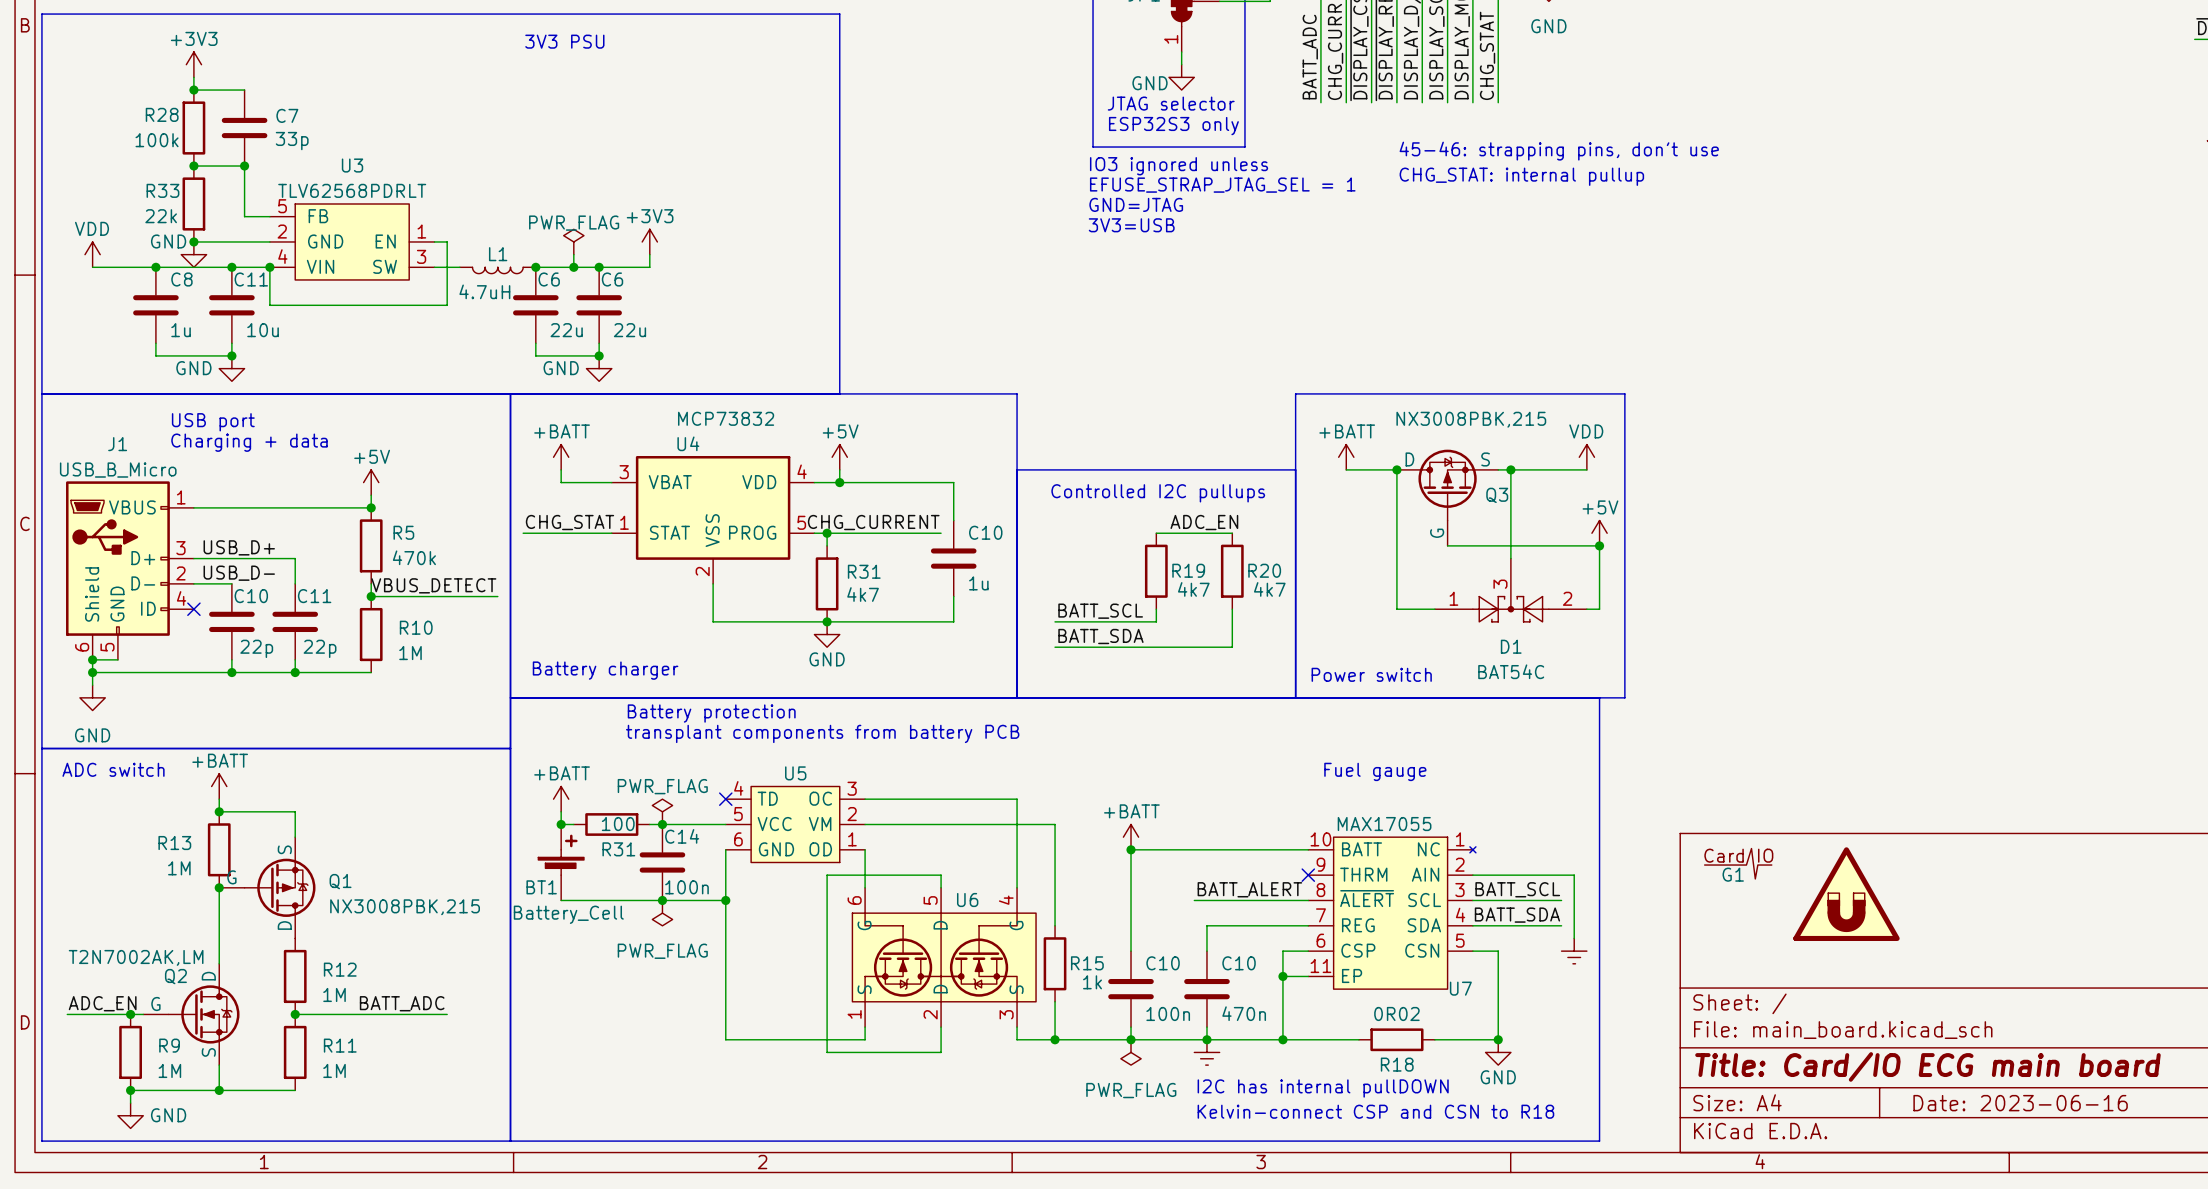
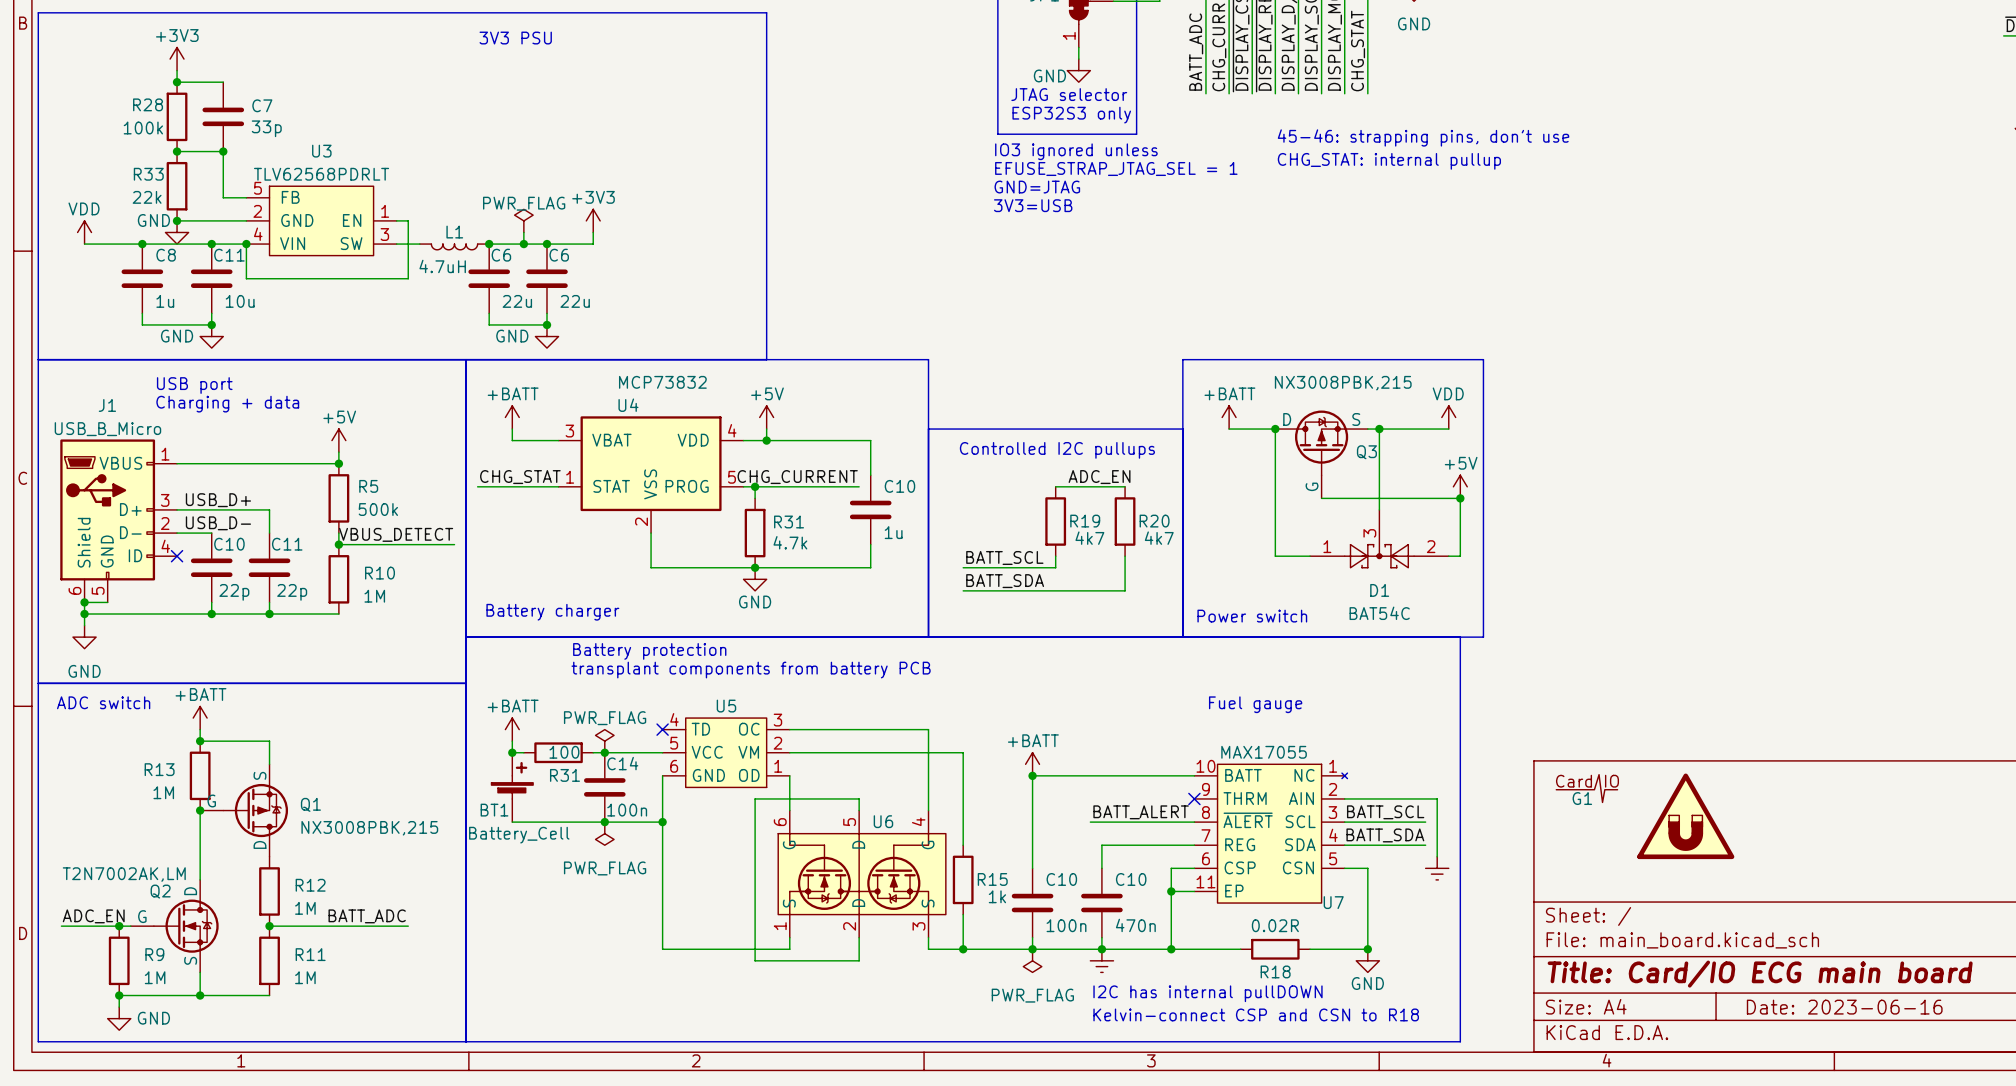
R5 value: 470k (414, 557) -> 500k (378, 509)
R31 value: 4k7 (863, 594) -> 4.7k (790, 542)
R18 value: 0R02 (1396, 1013) -> 0.02R (1275, 925)

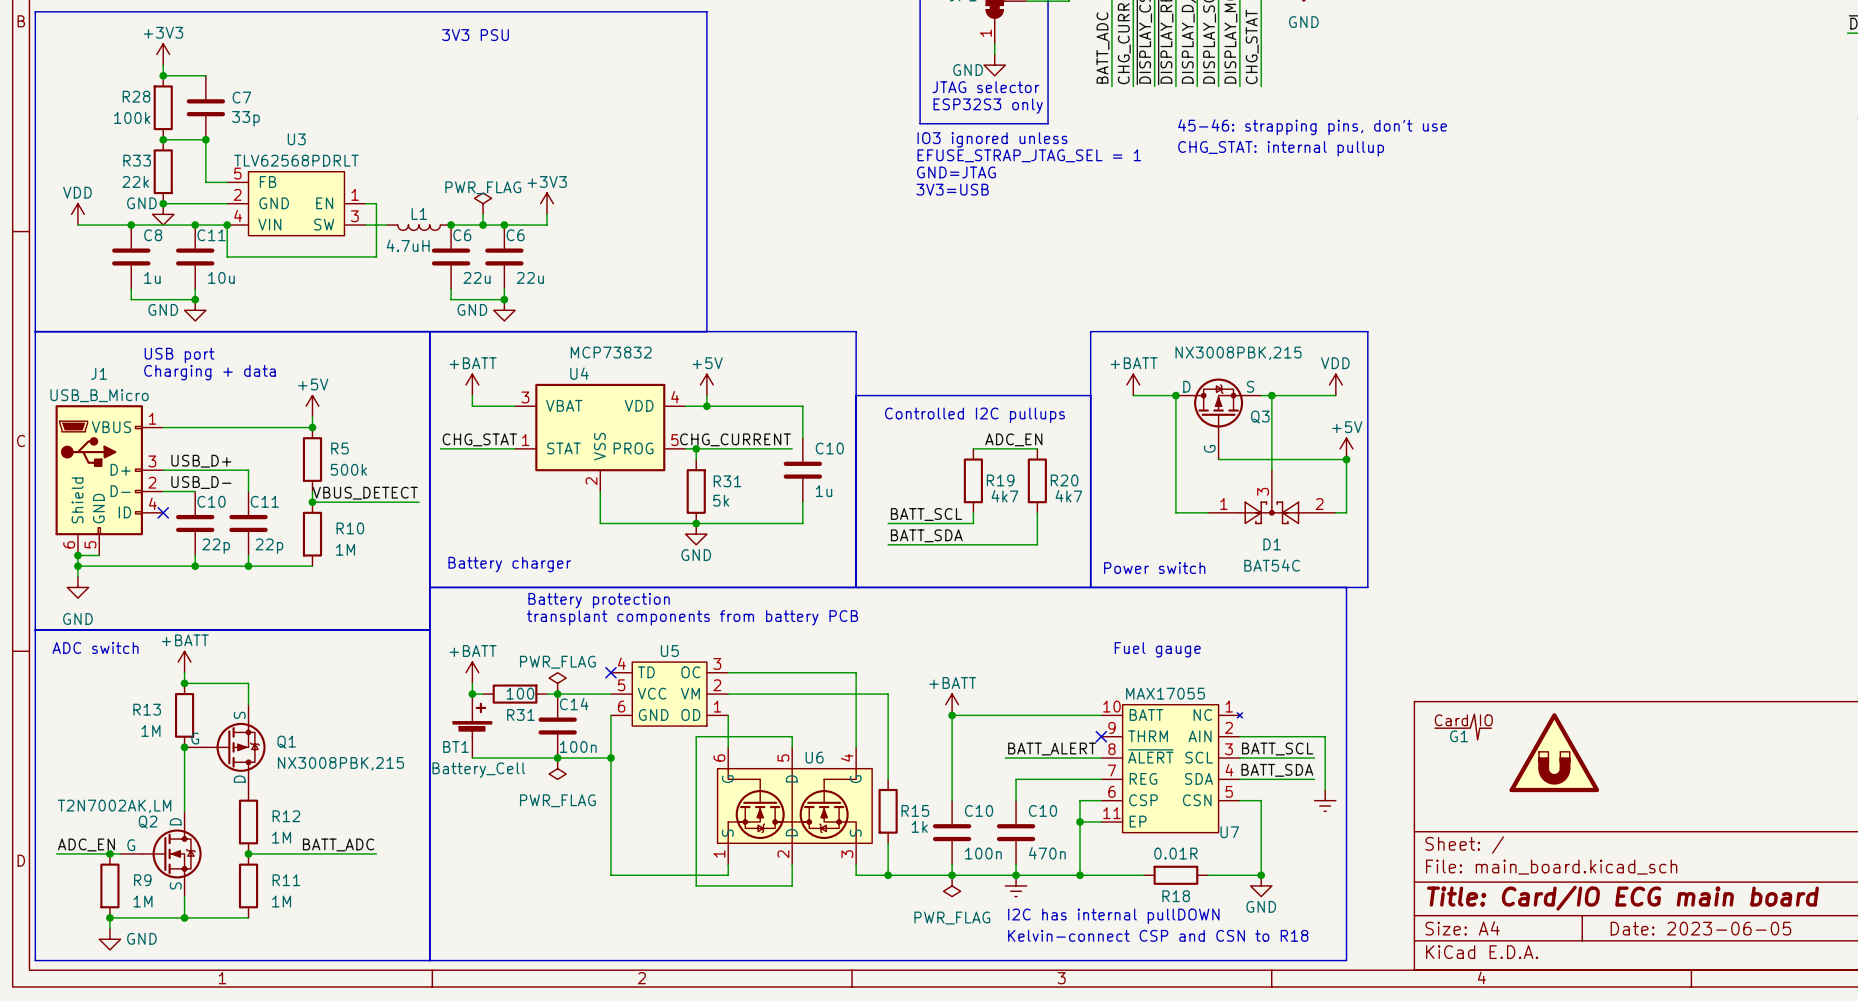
R31 value: 4.7k (790, 542) -> 5k (721, 500)
R18 value: 0.02R (1275, 925) -> 0.01R (1175, 853)
title block: Date: 2023-06-16 (1844, 1007) -> Date: 2023-06-05 (1700, 928)

